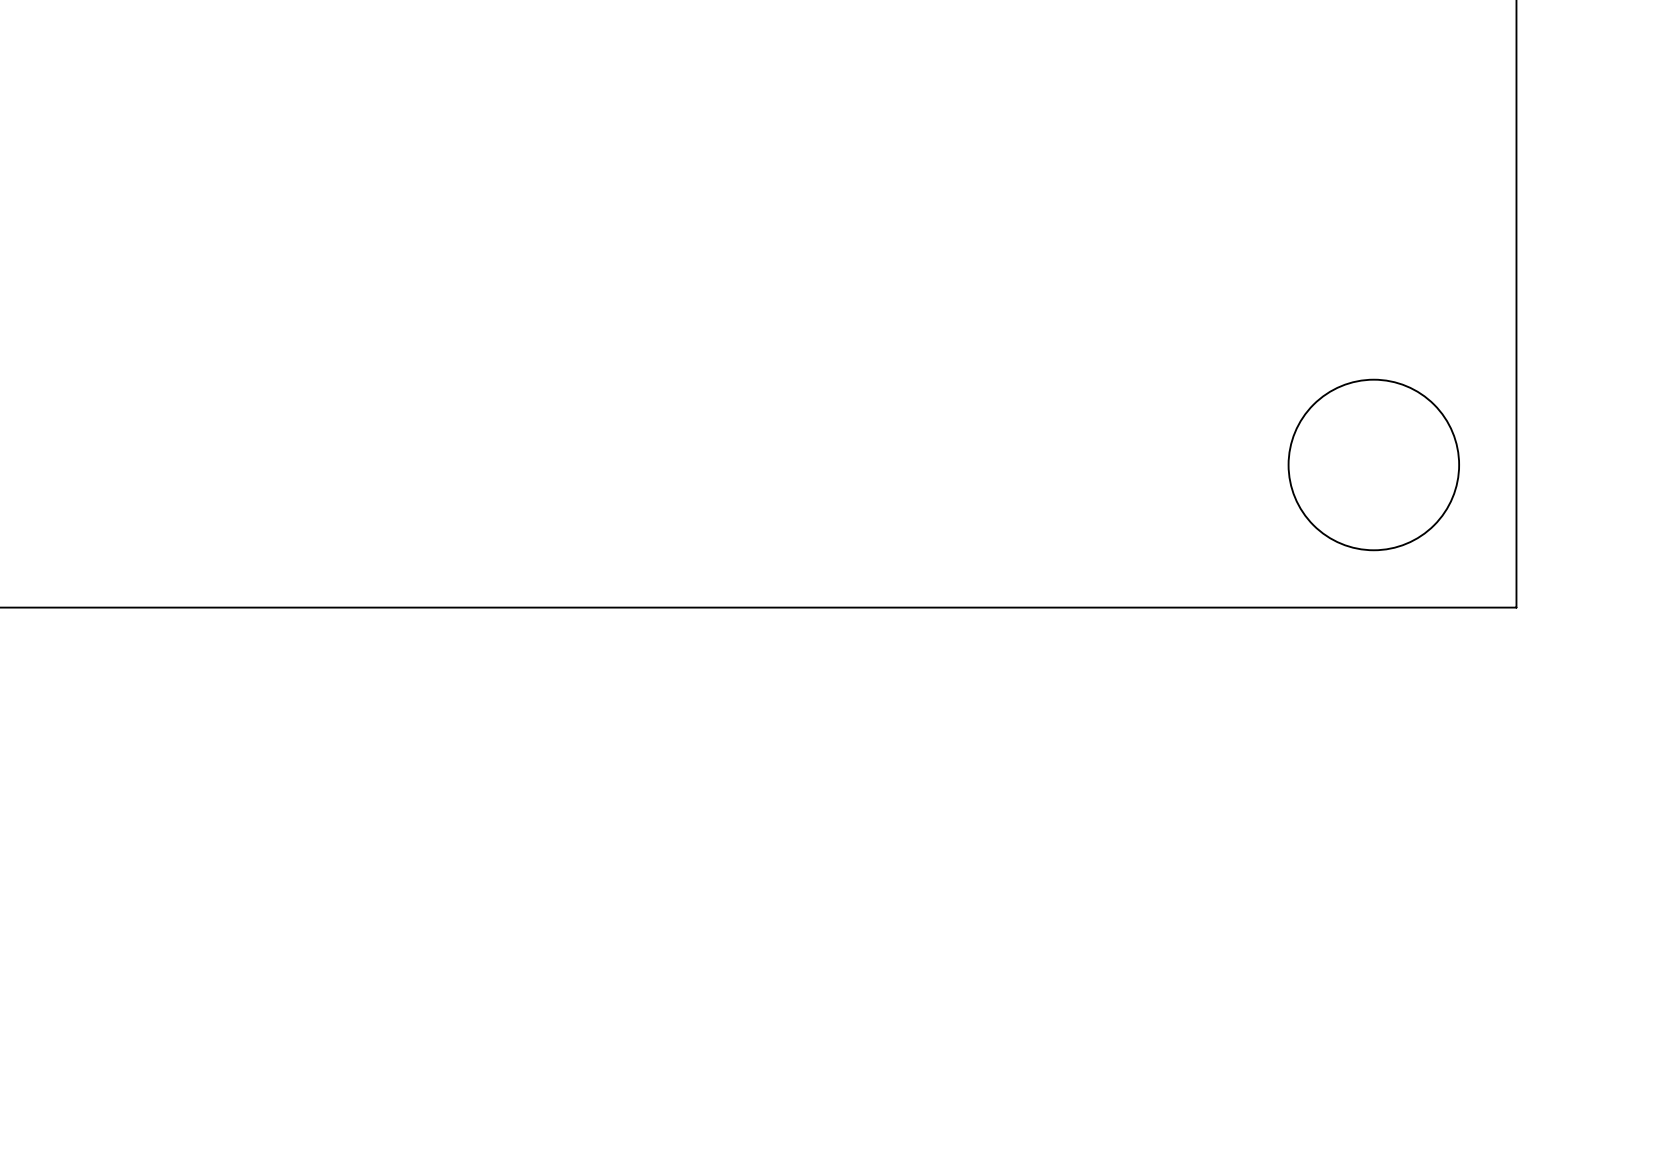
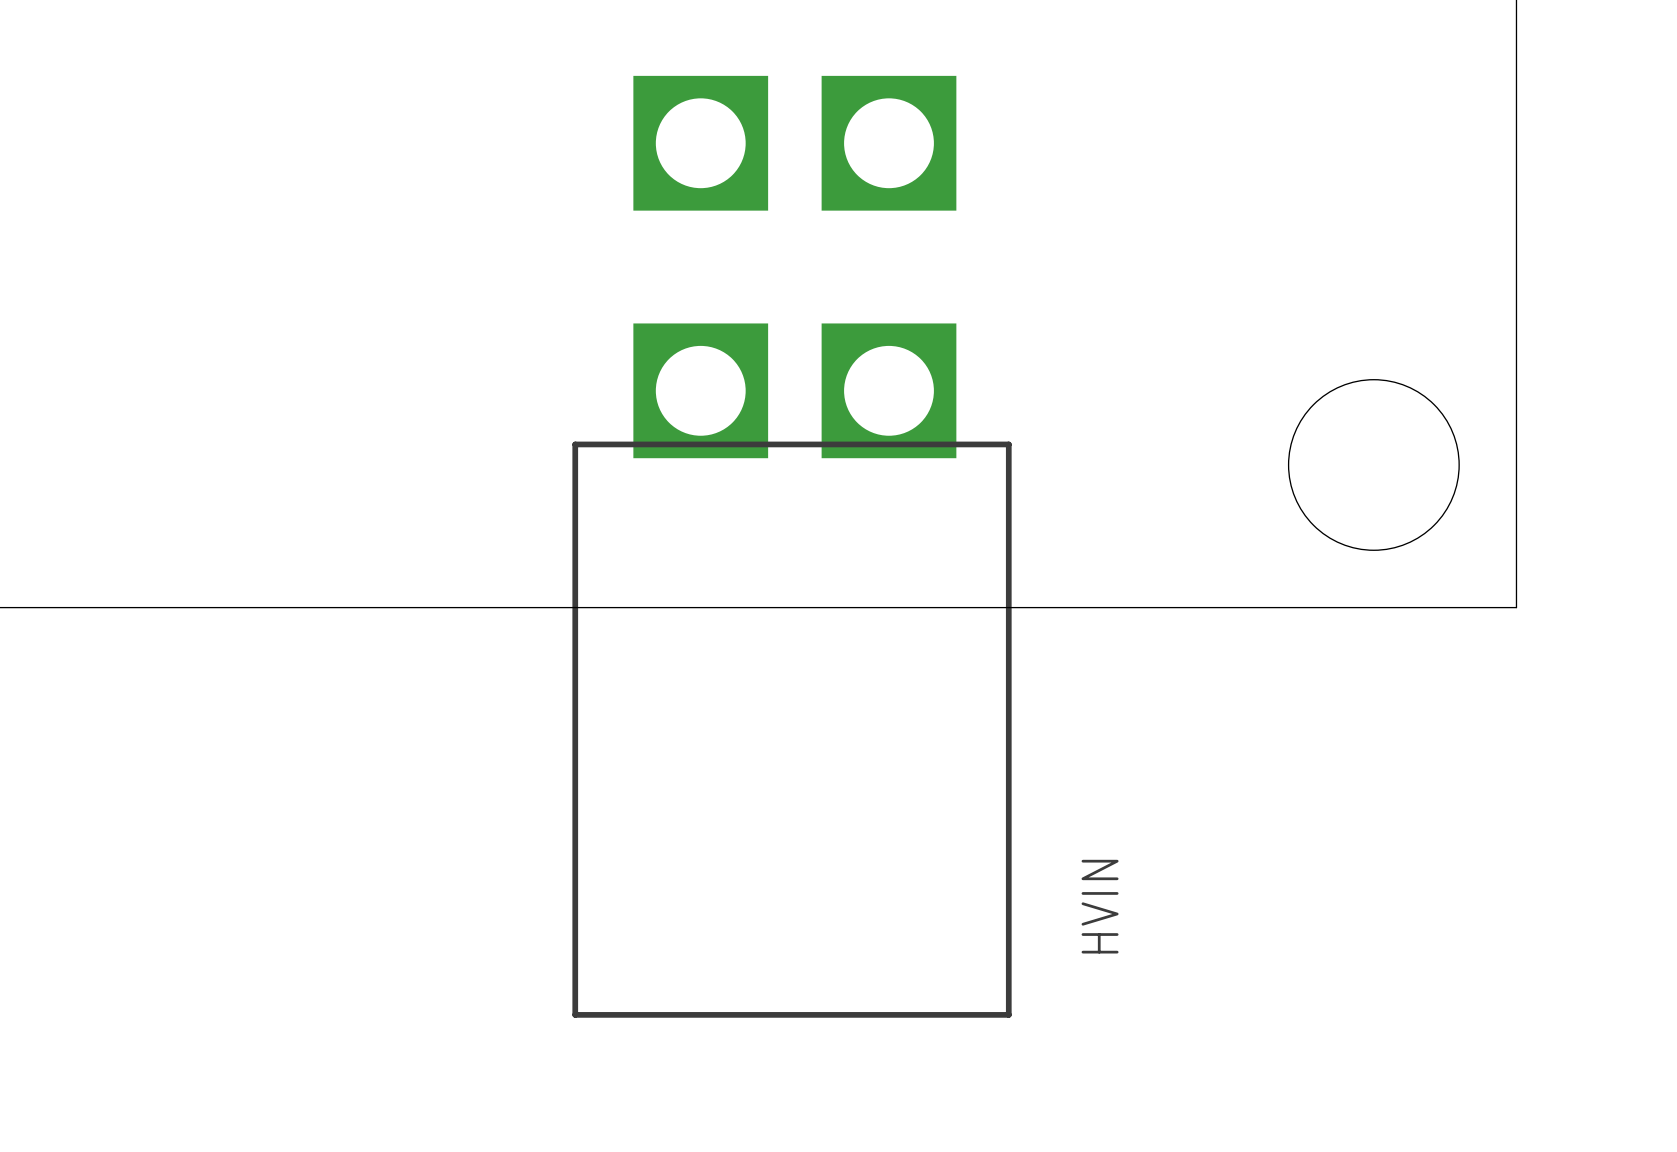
HVIN: none -> (792, 546)

